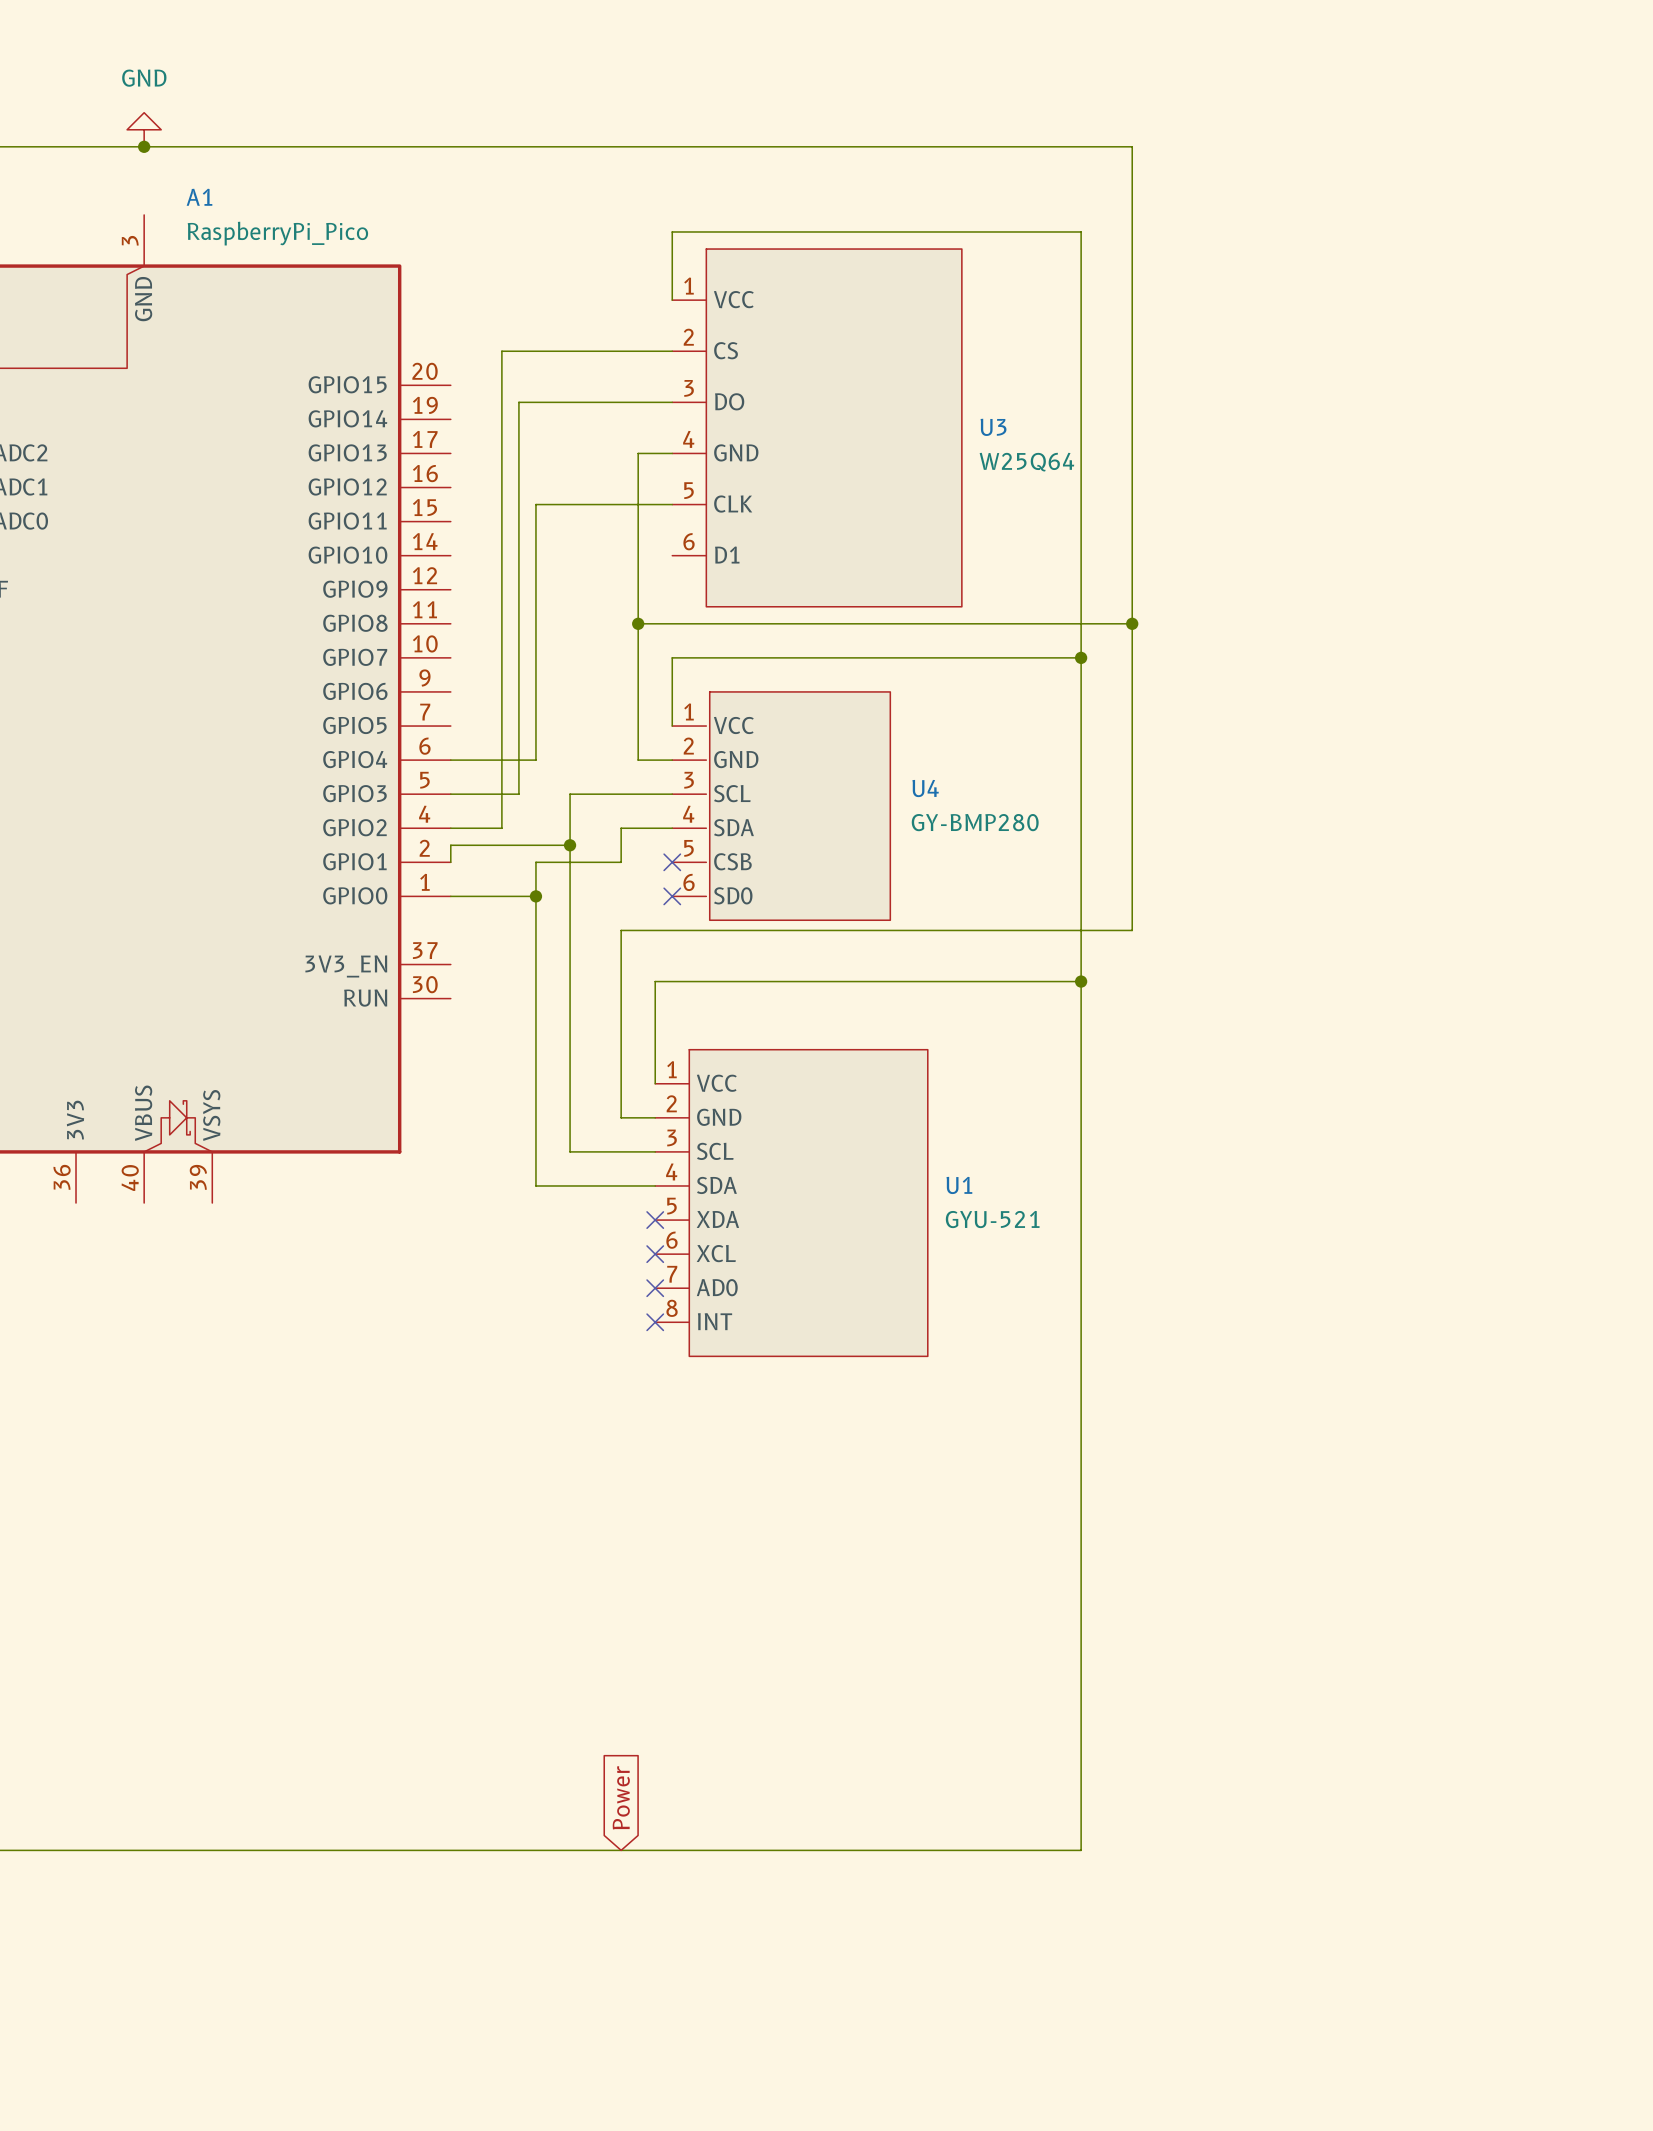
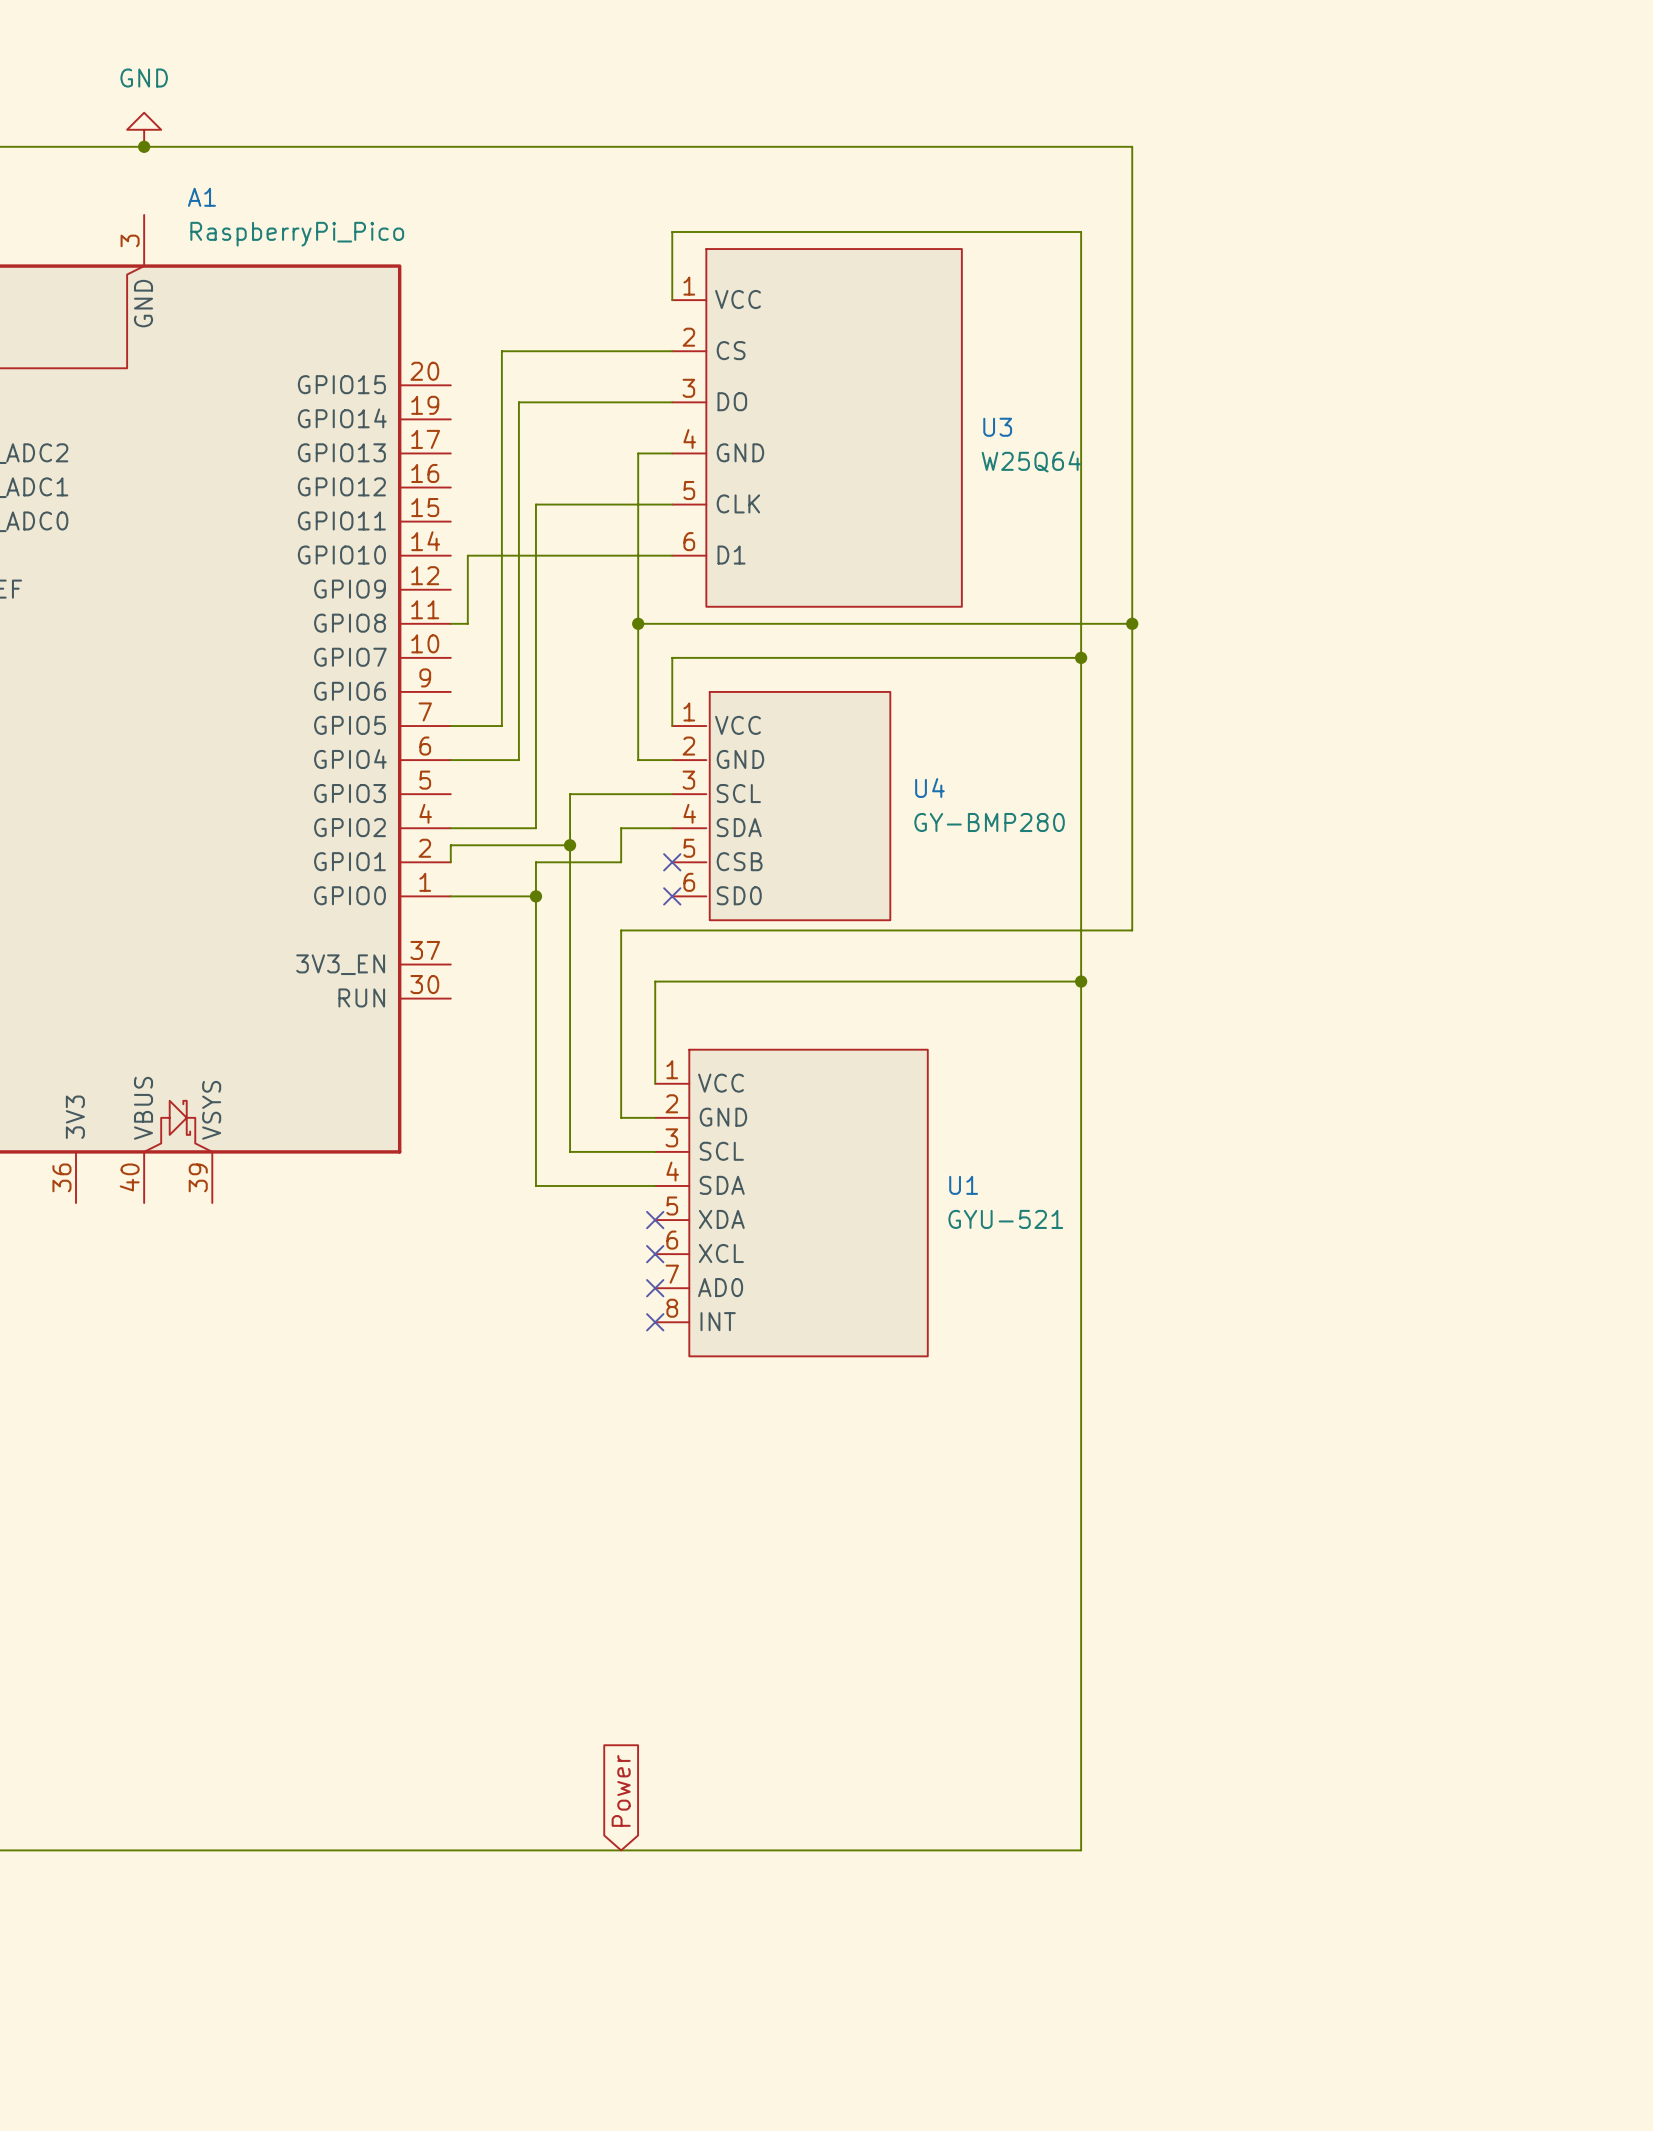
wire: none -> (672, 555) (467, 555) (467, 623) (450, 623)
wire: none -> (450, 726) (501, 726)
wire: (501, 726) (501, 828) -> (535, 760) (535, 828) (501, 828)
wire: (535, 760) (518, 760) (518, 794) (450, 794) -> none

